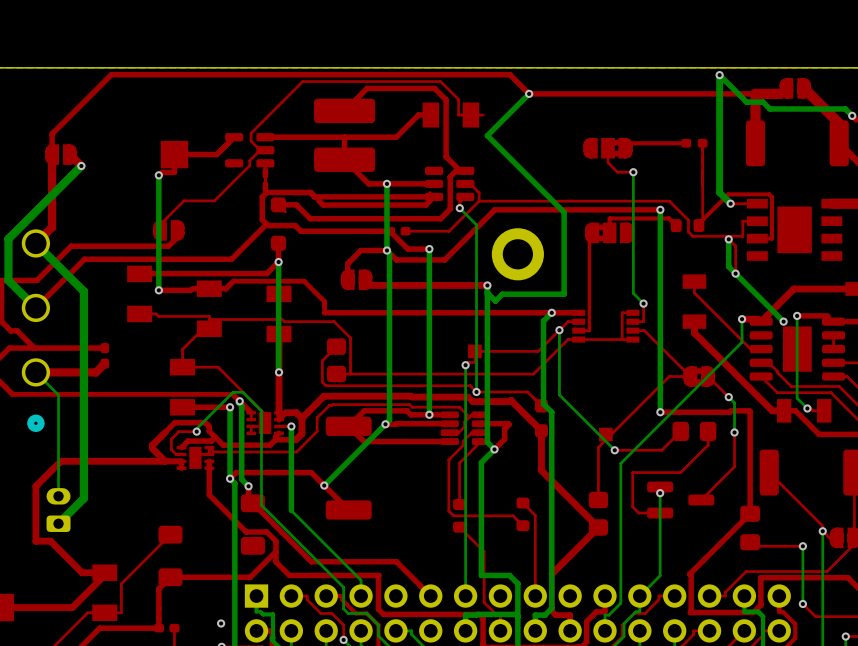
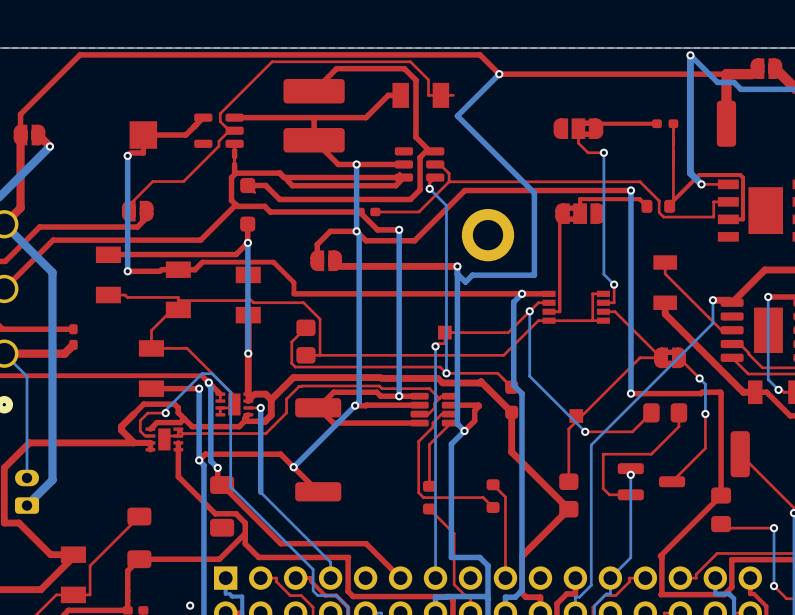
top track: (728, 239) (735, 246) (735, 273) -> none
bottom track: (728, 239) (728, 266) (783, 321) -> none
via: (728, 239) -> none
via: (735, 273) -> none
via: (783, 321) -> none

